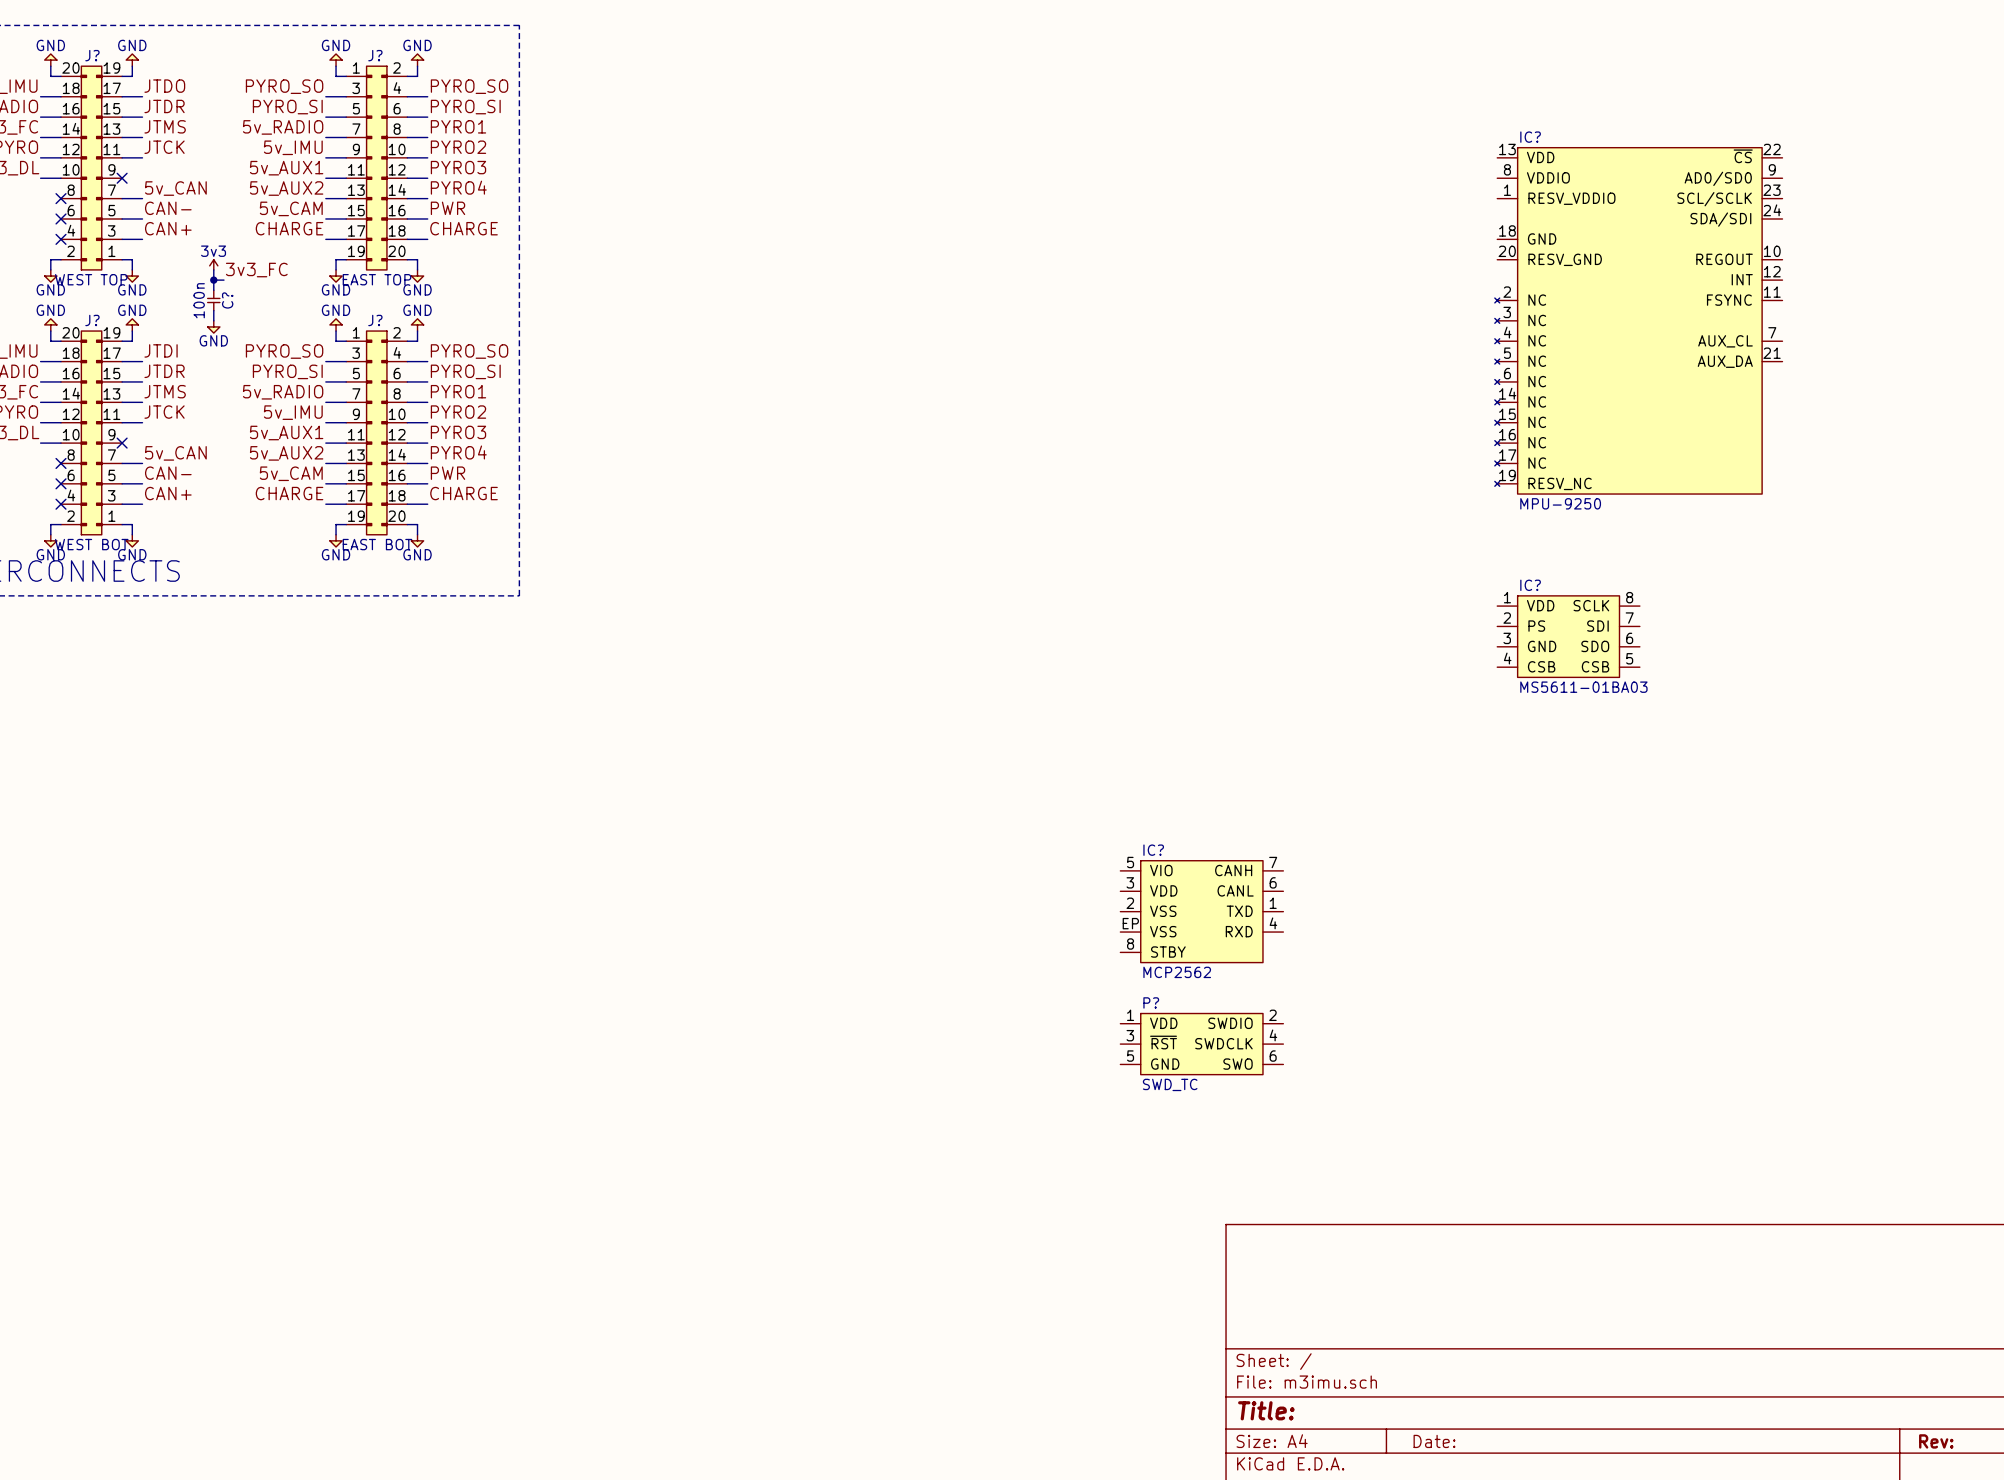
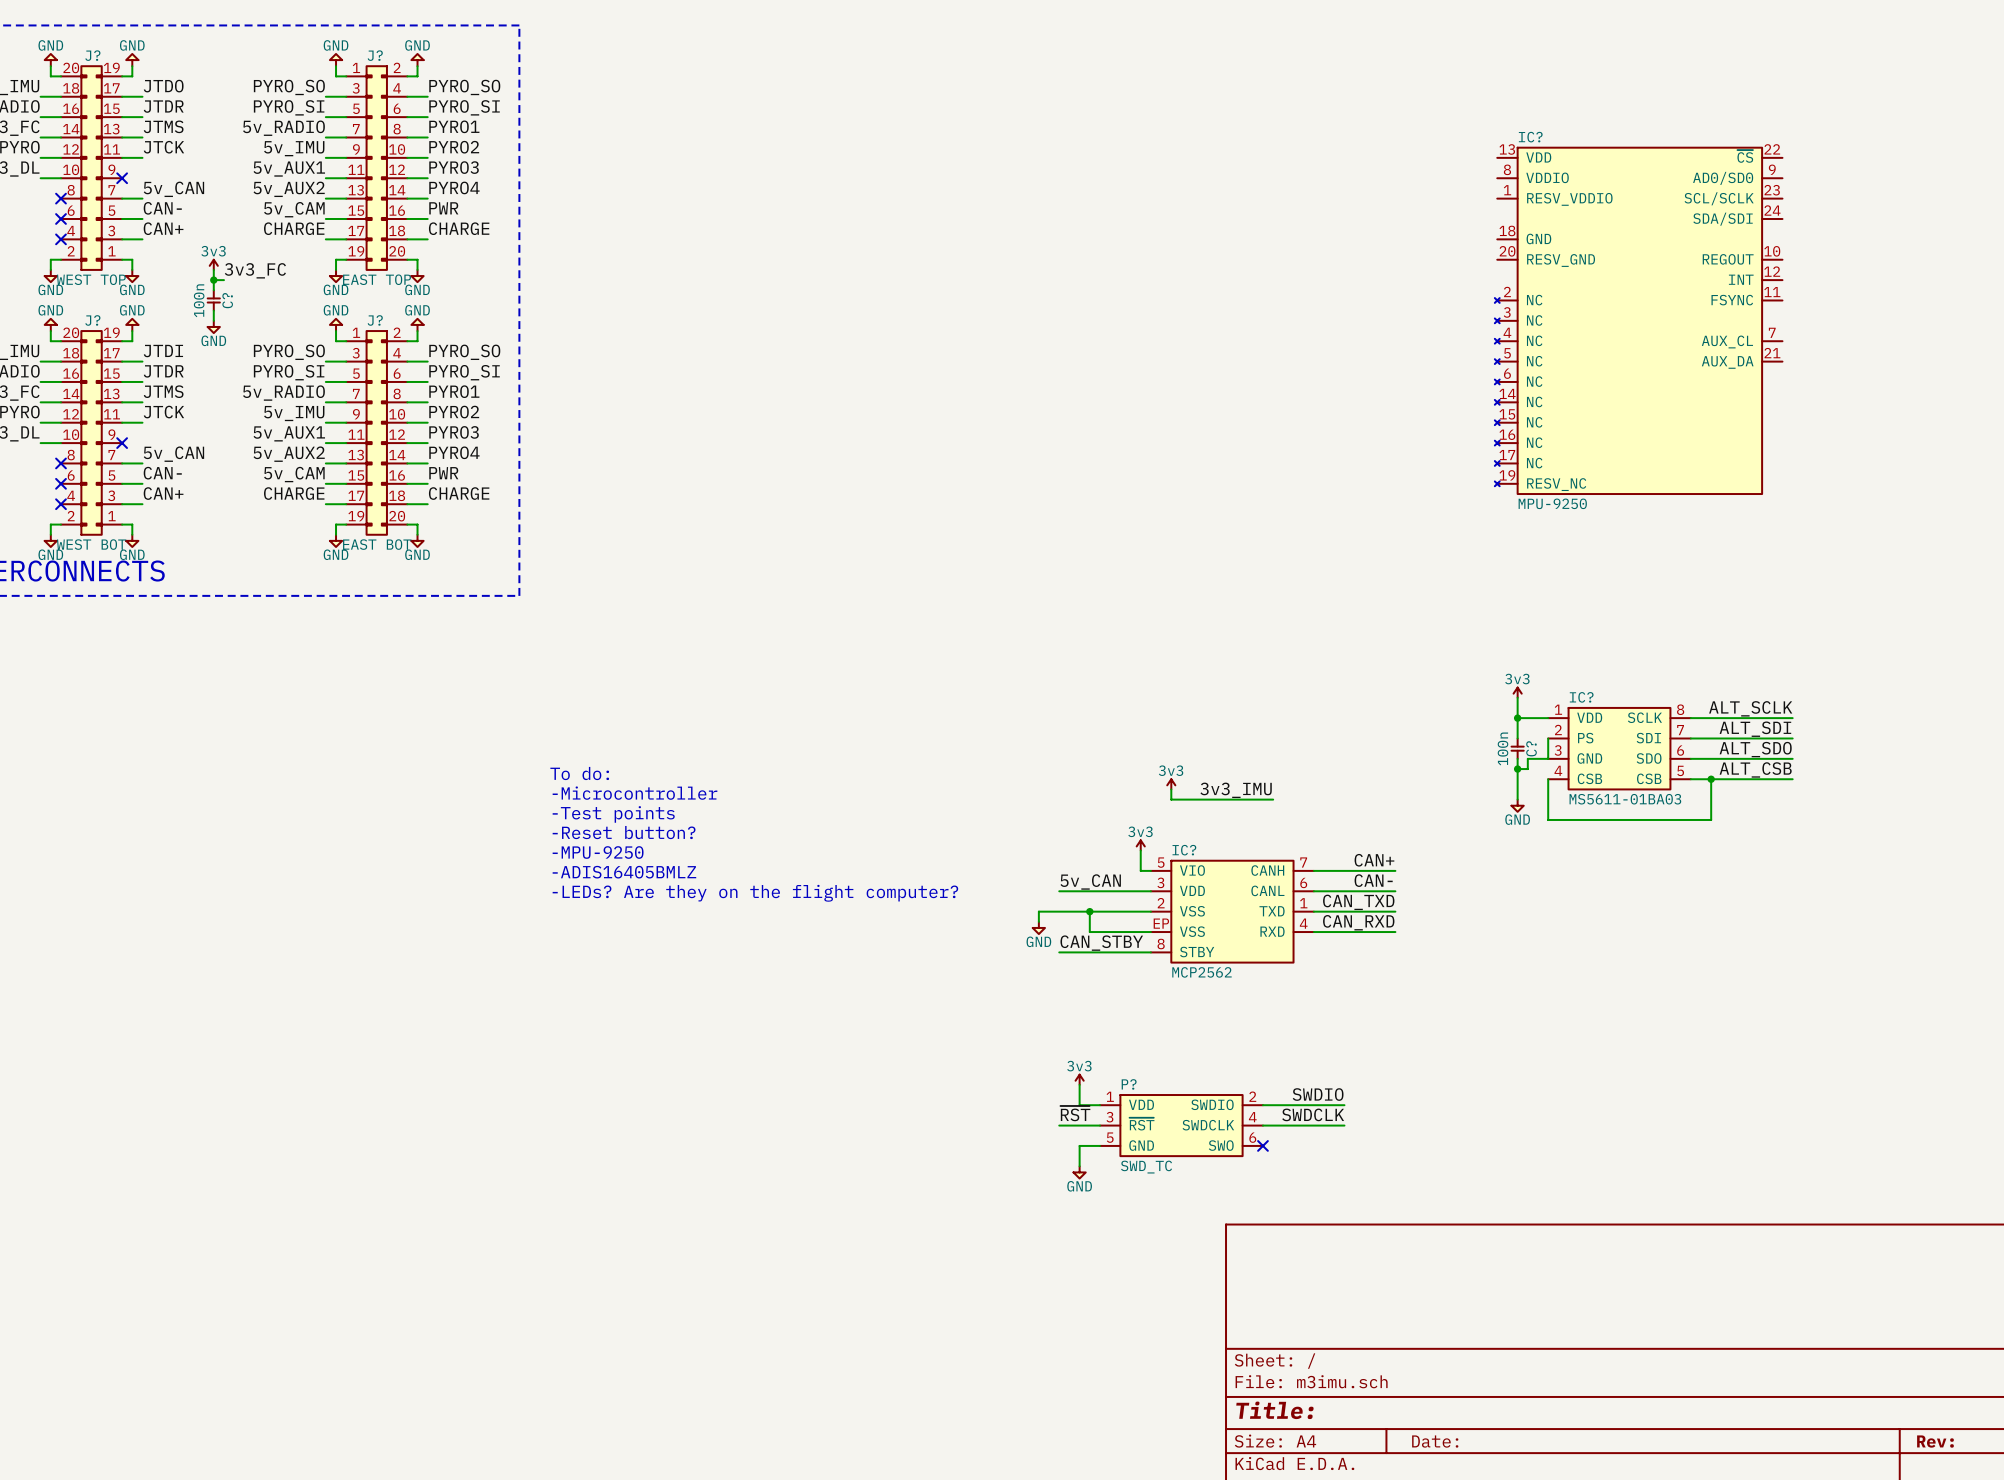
IC? position: (1568, 636) -> (1619, 748)
power symbol: none -> 3v3 (1517, 692)
wire: none -> (1517, 697) (1517, 738)
label: none -> ALT_SCLK (1750, 708)
wire: none -> (1517, 718) (1548, 718)
junction: none -> (1517, 718)
wire: none -> (1690, 718) (1792, 718)
label: none -> ALT_SDI (1755, 729)
wire: none -> (1548, 738) (1548, 758) (1527, 758) (1527, 769) (1517, 769)
wire: none -> (1690, 738) (1792, 738)
C?: none -> 100n (1517, 748)
label: none -> ALT_SDO (1755, 749)
wire: none -> (1517, 758) (1517, 799)
wire: none -> (1690, 758) (1792, 758)
junction: none -> (1517, 769)
label: none -> ALT_CSB (1755, 769)
text: none -> To do: (579, 773)
wire: none -> (1548, 779) (1548, 819) (1711, 819) (1711, 779)
wire: none -> (1690, 779) (1792, 779)
junction: none -> (1711, 779)
power symbol: none -> 3v3 (1171, 784)
wire: none -> (1171, 789) (1171, 799) (1273, 799)
label: none -> 3v3_IMU (1236, 790)
text: none -> -Microcontroller (635, 793)
power symbol: none -> GND (1517, 805)
text: none -> -Test points (613, 814)
text: none -> -Reset button? (624, 832)
power symbol: none -> 3v3 (1140, 845)
text: none -> -MPU-9250 (598, 852)
label: none -> CAN+ (1374, 860)
wire: none -> (1313, 870) (1395, 870)
text: none -> -ADIS16405BMLZ (624, 872)
label: none -> CAN- (1373, 880)
label: none -> 5v_CAN (1090, 881)
wire: none -> (1059, 891) (1150, 891)
wire: none -> (1313, 891) (1395, 891)
text: none -> -LEDs? Are they on the flight computer? (755, 893)
label: none -> CAN_TXD (1358, 902)
wire: none -> (1089, 911) (1089, 932) (1150, 932)
junction: none -> (1089, 911)
wire: none -> (1150, 911) (1038, 911) (1038, 921)
IC? position: (1201, 911) -> (1232, 911)
wire: none -> (1313, 911) (1395, 911)
label: none -> CAN_RXD (1358, 922)
power symbol: none -> GND (1038, 927)
wire: none -> (1313, 932) (1395, 932)
label: none -> CAN_STBY (1101, 943)
wire: none -> (1059, 952) (1150, 952)
P? position: (1201, 1044) -> (1181, 1125)
power symbol: none -> 3v3 (1079, 1079)
wire: none -> (1079, 1084) (1079, 1105) (1100, 1105)
label: none -> SWDIO (1318, 1094)
wire: none -> (1262, 1105) (1344, 1105)
label: none -> ~{RST} (1075, 1113)
label: none -> SWDCLK (1313, 1114)
wire: none -> (1059, 1125) (1100, 1125)
wire: none -> (1262, 1125) (1344, 1125)
wire: none -> (1100, 1145) (1079, 1145) (1079, 1166)
no-connect mark: none -> (1262, 1145)
power symbol: none -> GND (1079, 1172)

